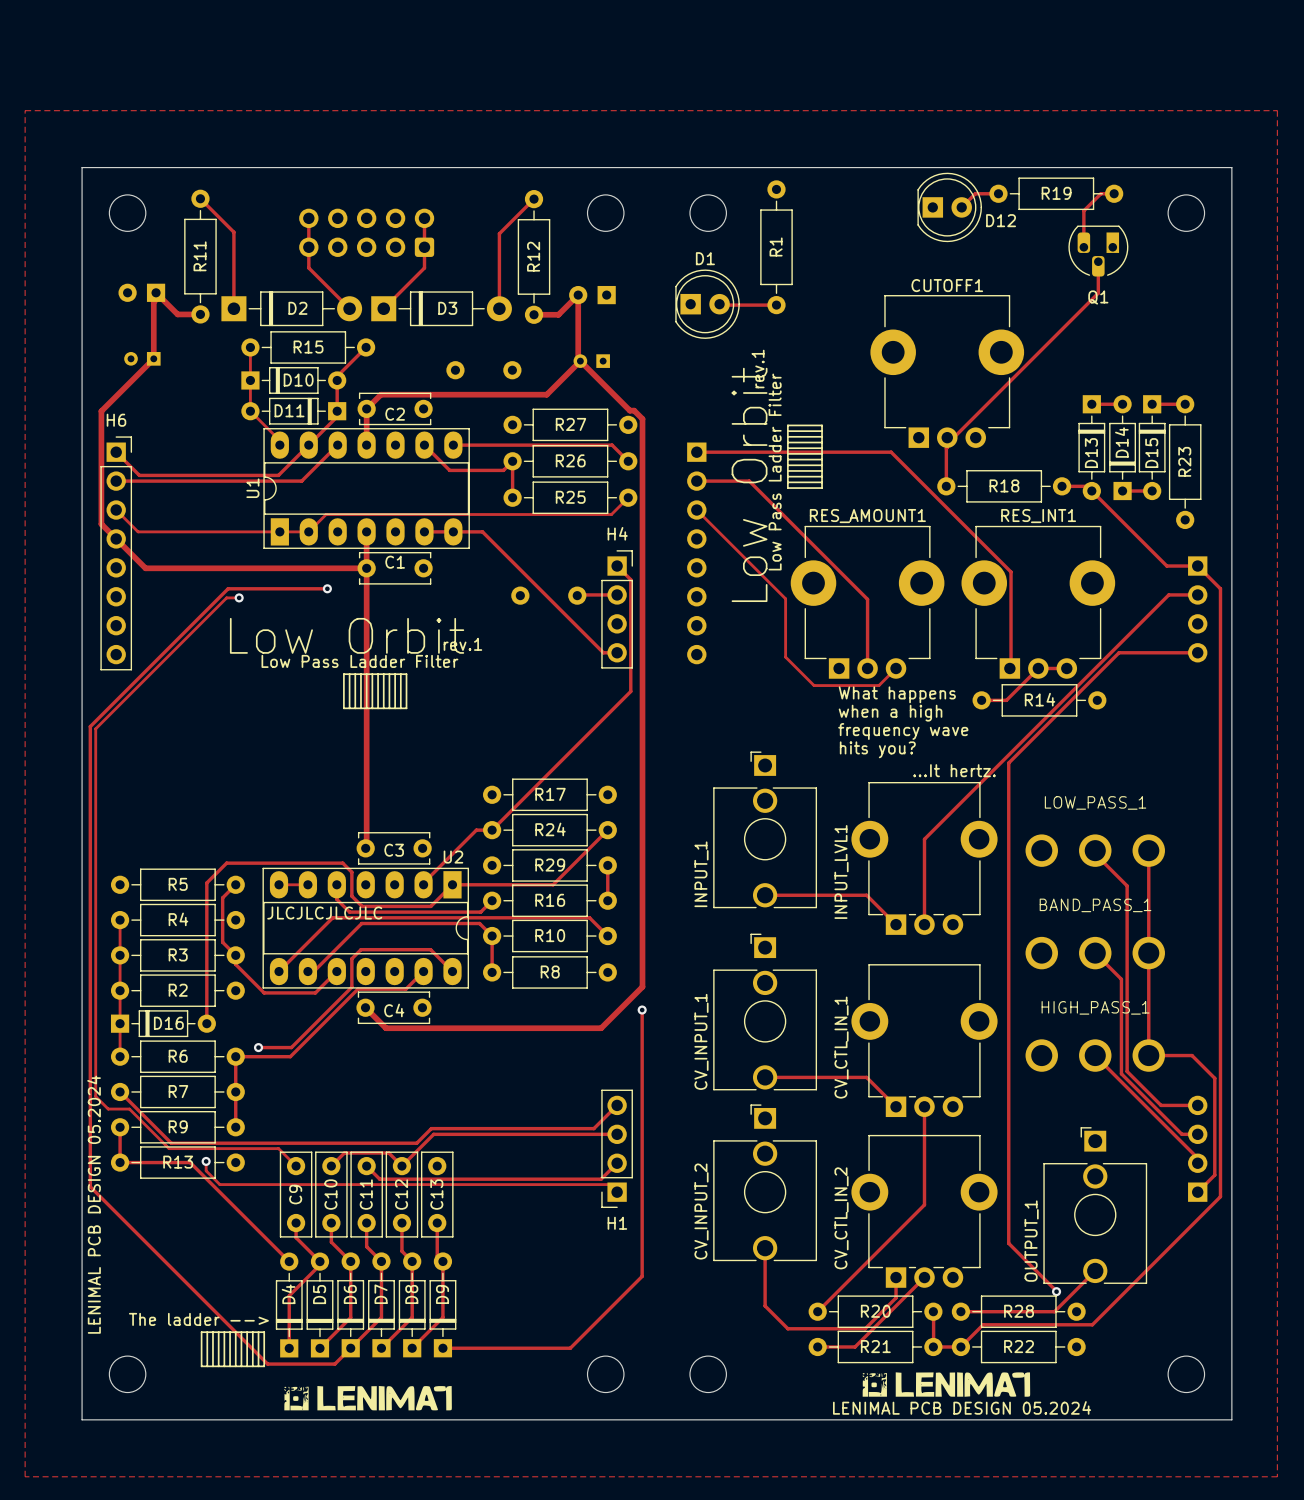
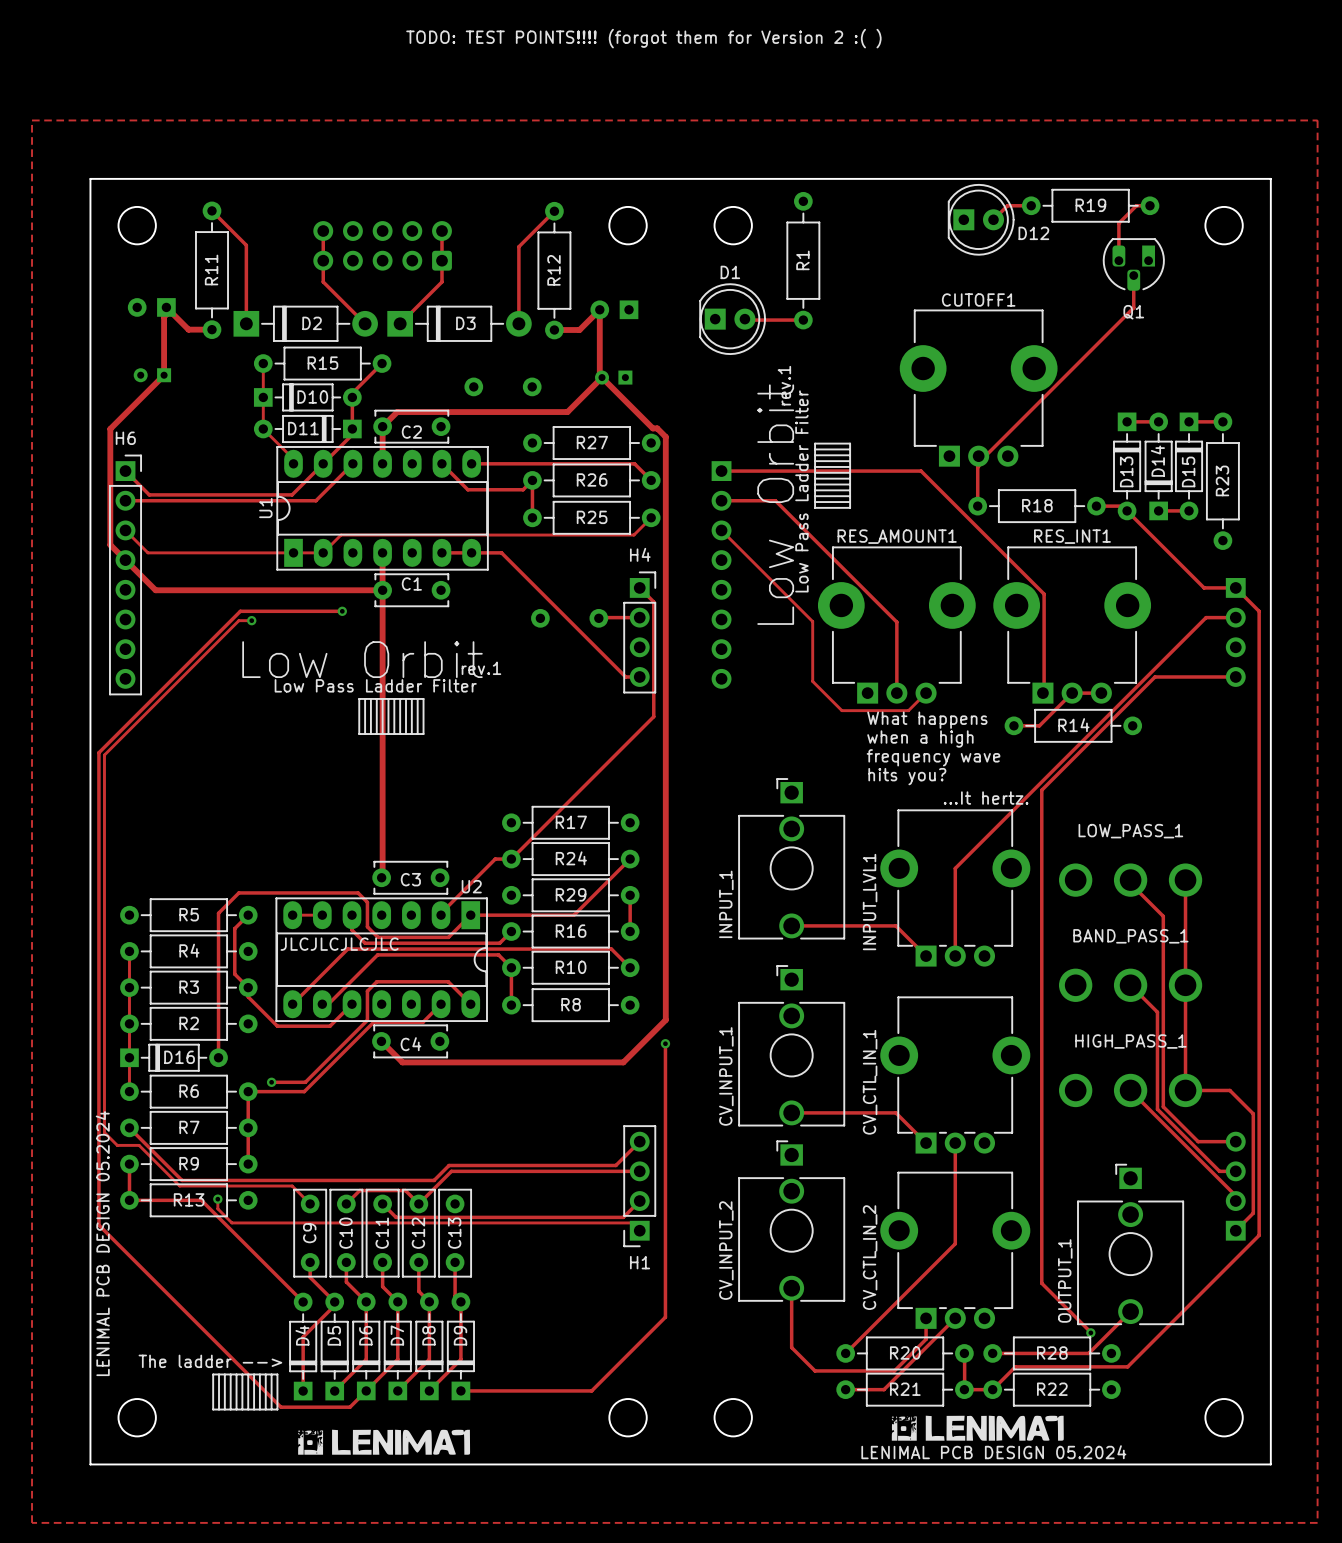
text: none -> TODO: TEST POINTS!!!! (forgot them for Version 2 :( ) (643, 38)

